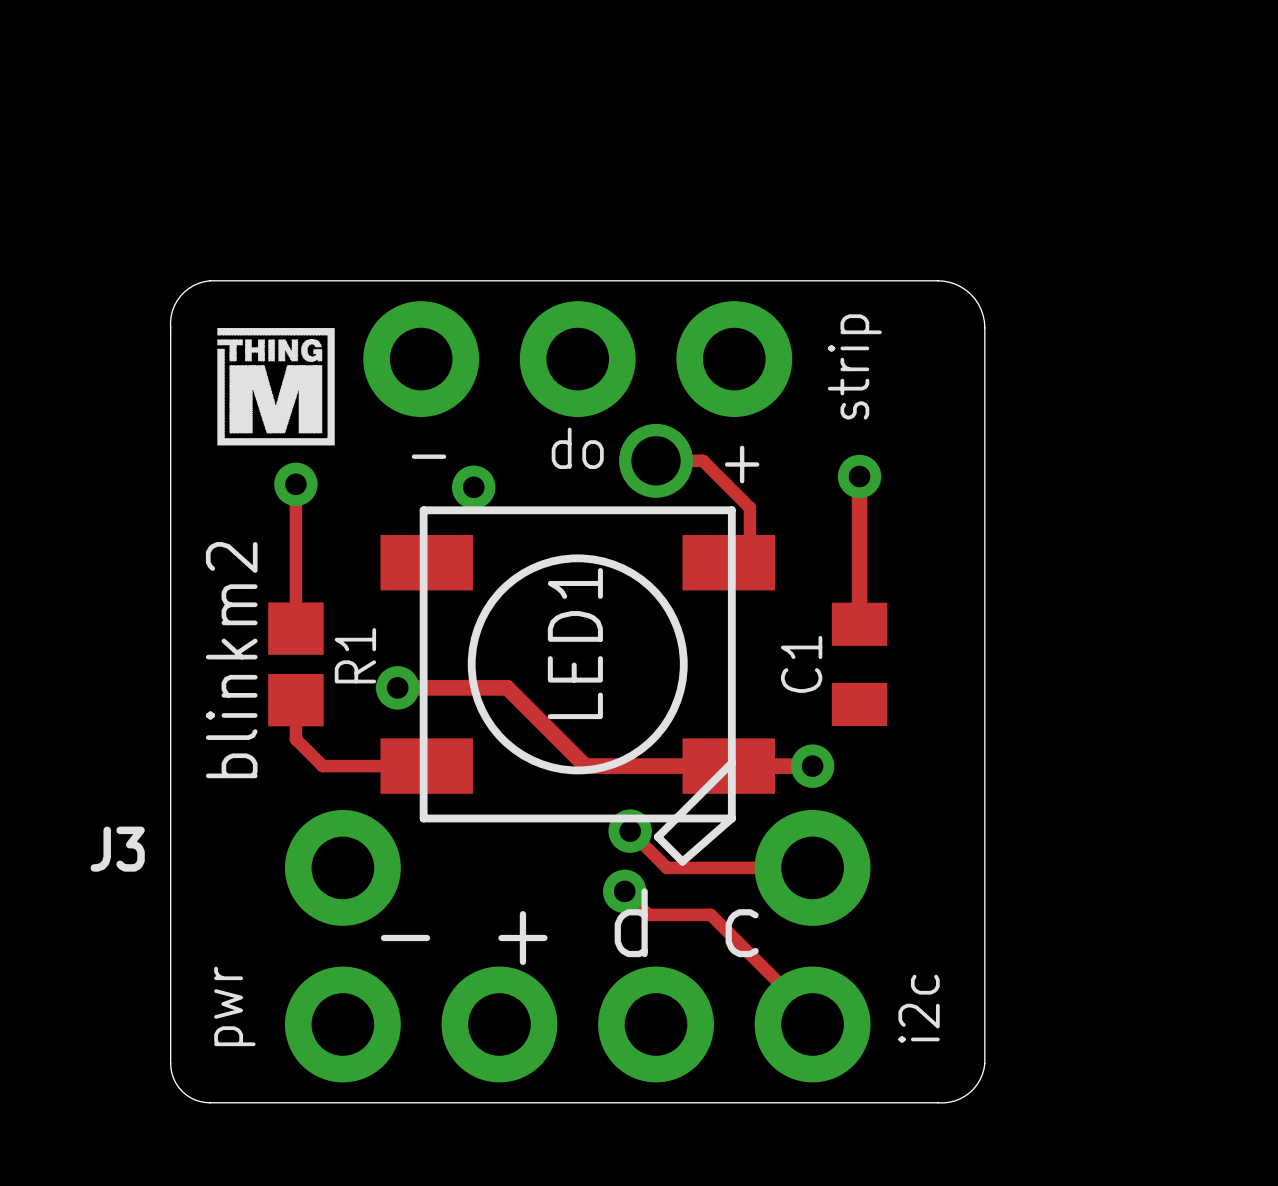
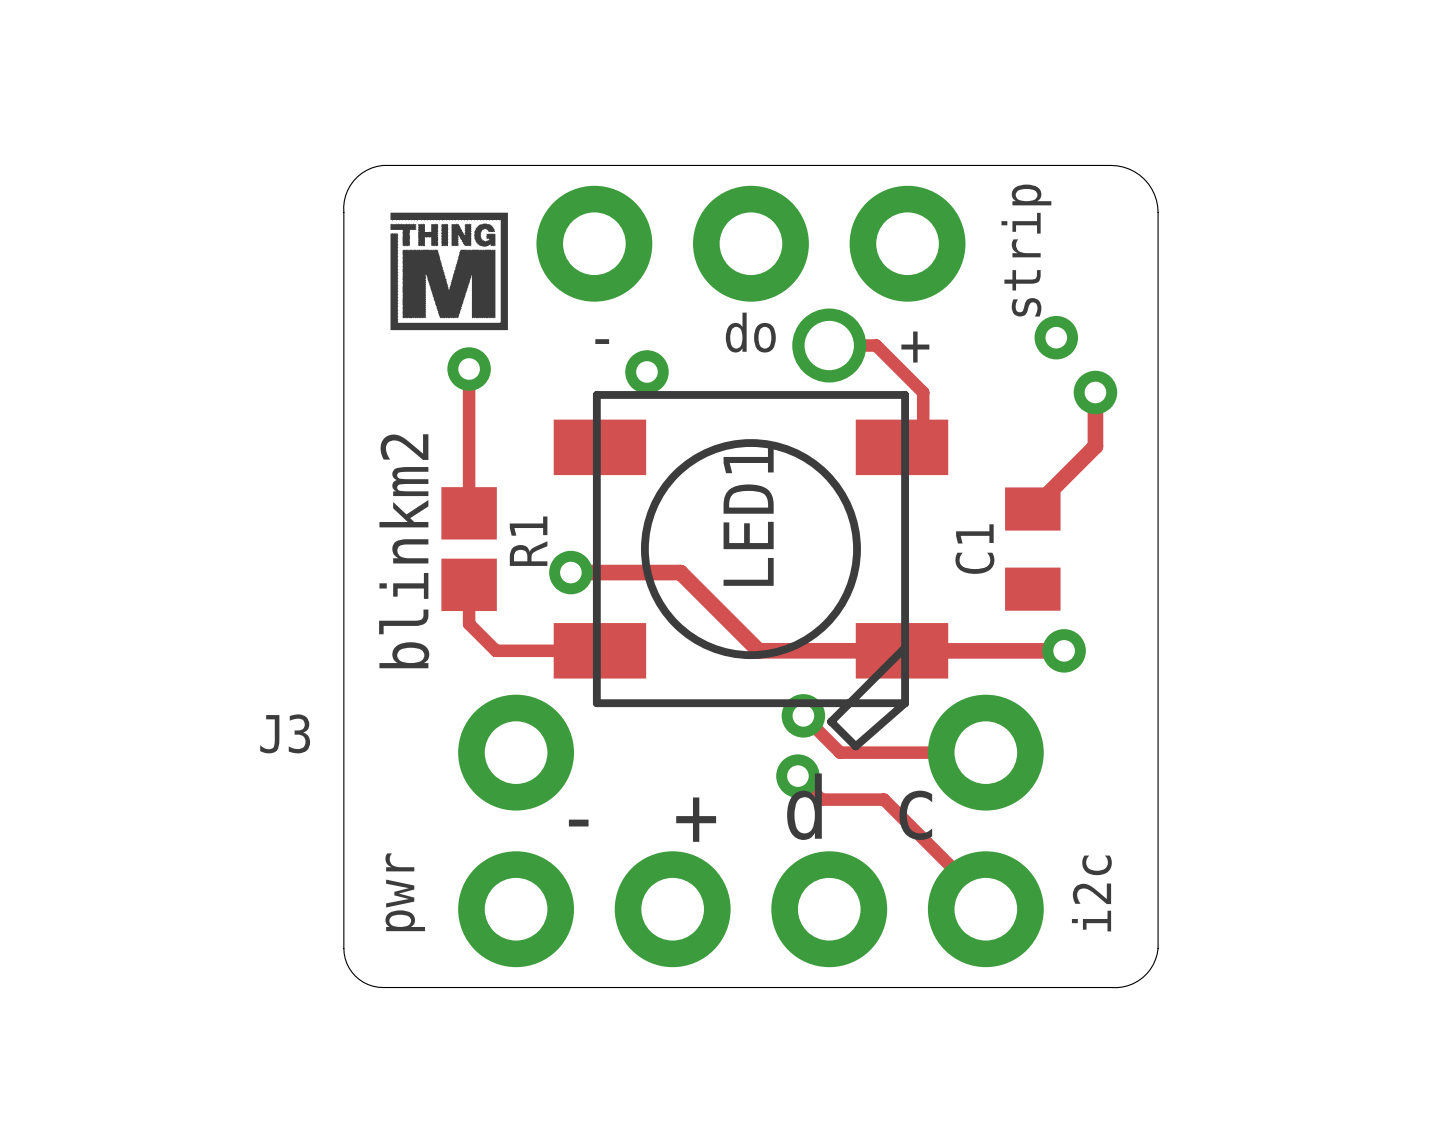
track: (859, 476) (859, 624) -> (1095, 392) (1095, 446) (1032, 509)
via position: (859, 476) -> (1056, 337)
via: none -> (1095, 392)
track: none -> (985, 650) (1064, 650)
via position: (812, 766) -> (1064, 650)

